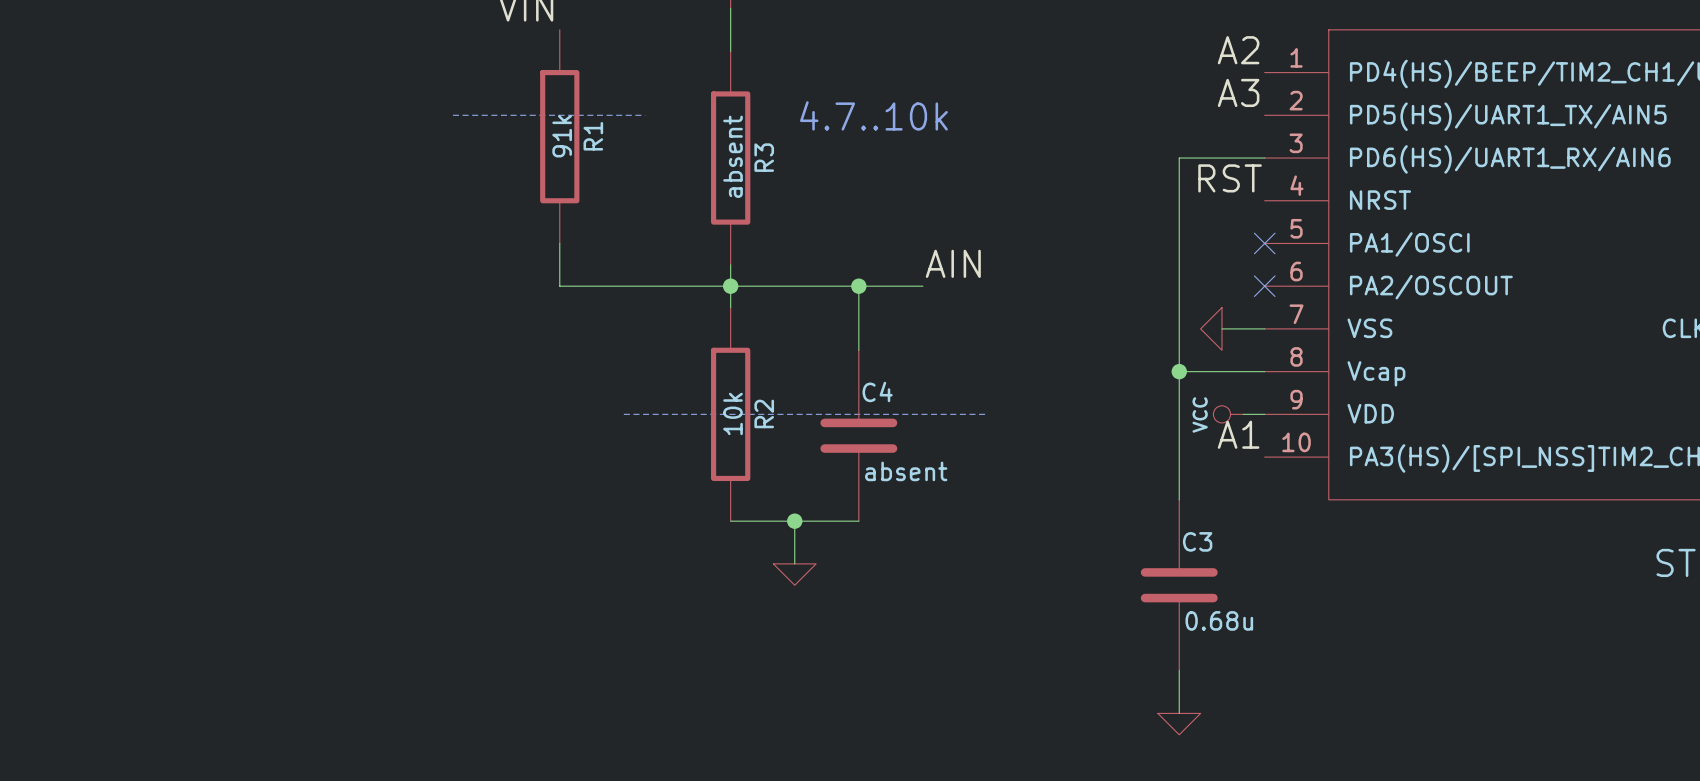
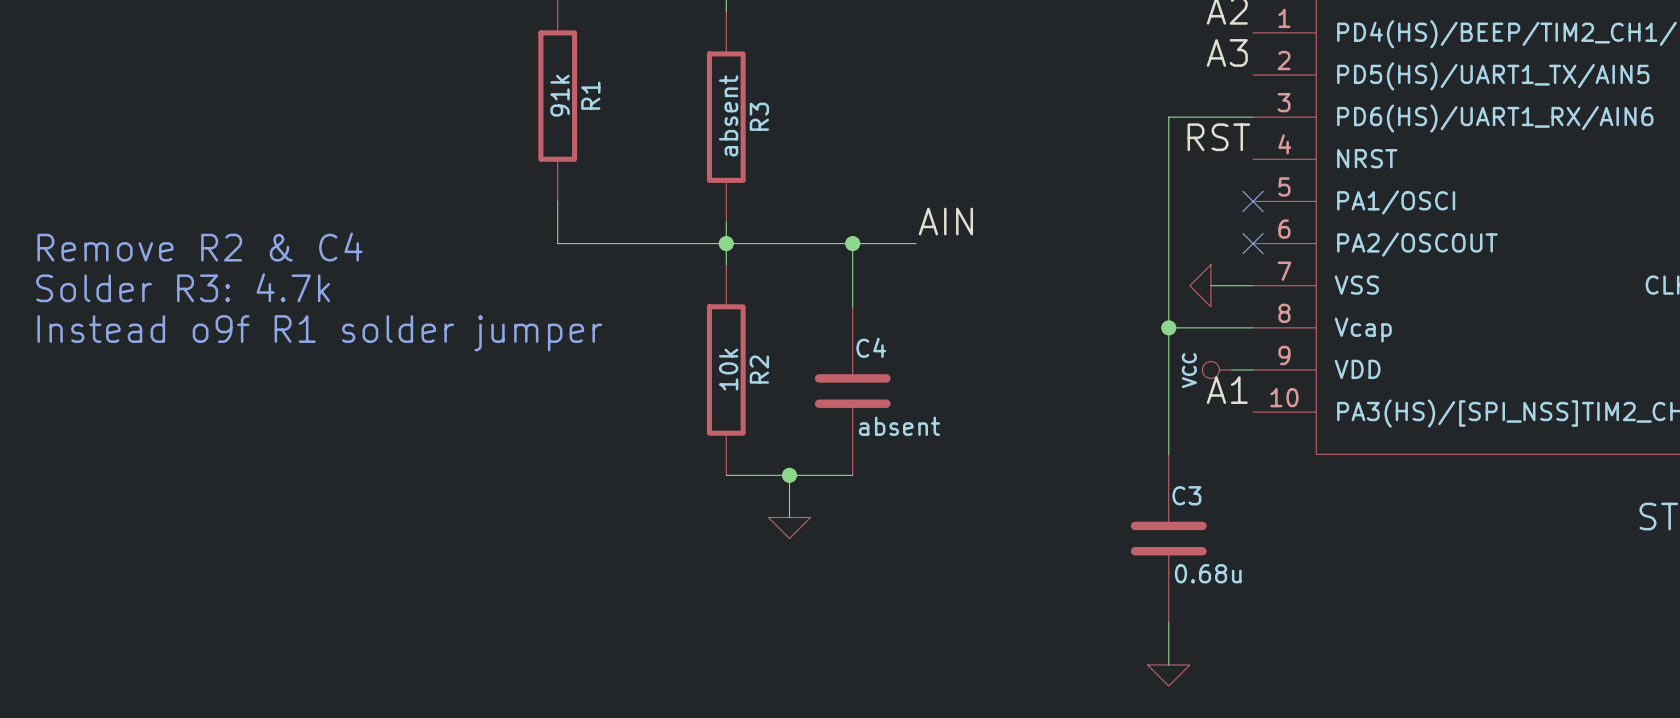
line: (452, 115) (645, 115) -> none
text: 4.7..10k (873, 115) -> none
text: none -> Remove R2 & C4 (200, 247)
text: none -> Solder R3: 4.7k (183, 287)
text: none -> Instead o9f R1 solder jumper (319, 333)
line: (623, 414) (987, 414) -> none

